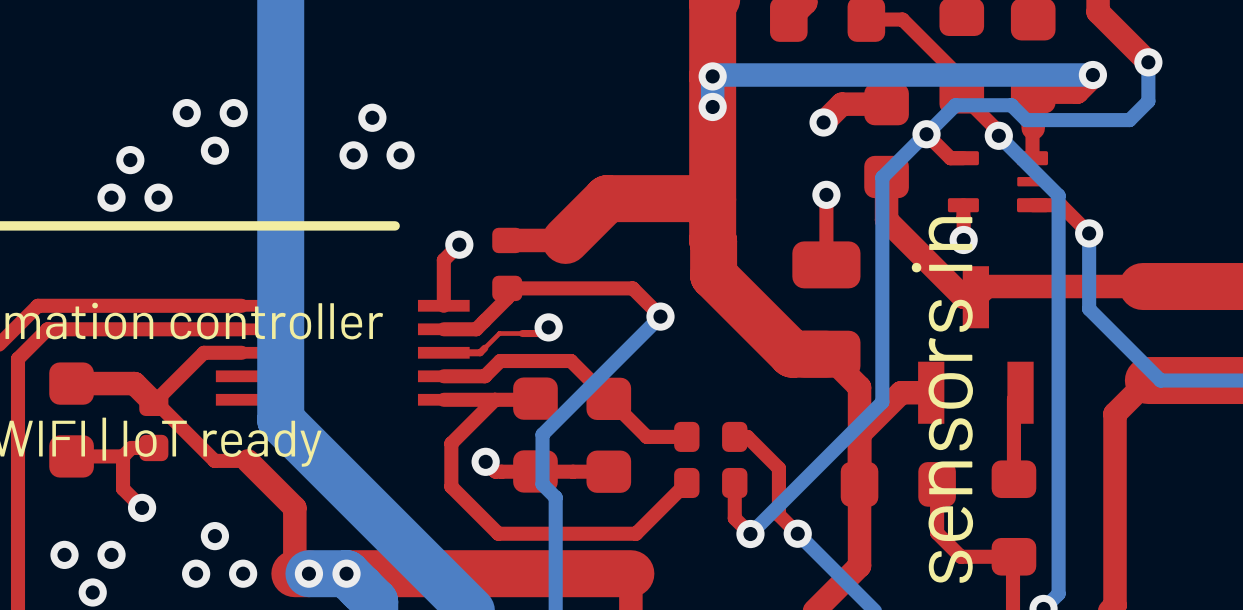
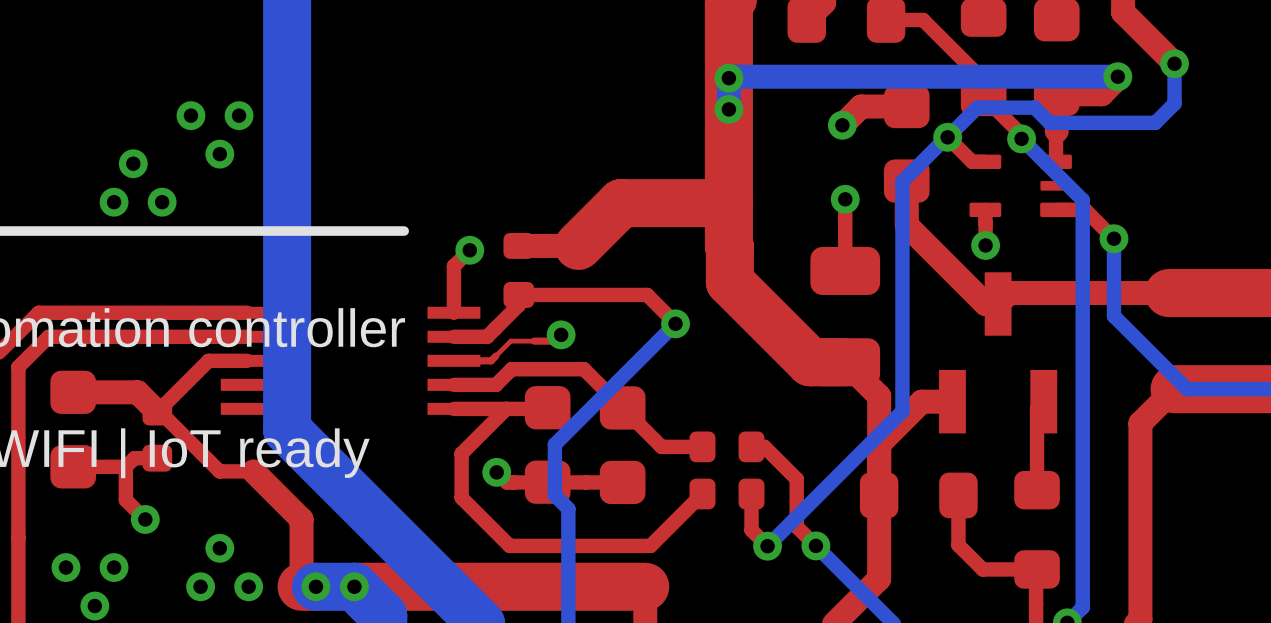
via: (372, 117) -> none
via: (353, 155) -> none
via: (400, 155) -> none
text: sensors in (942, 399) -> none

